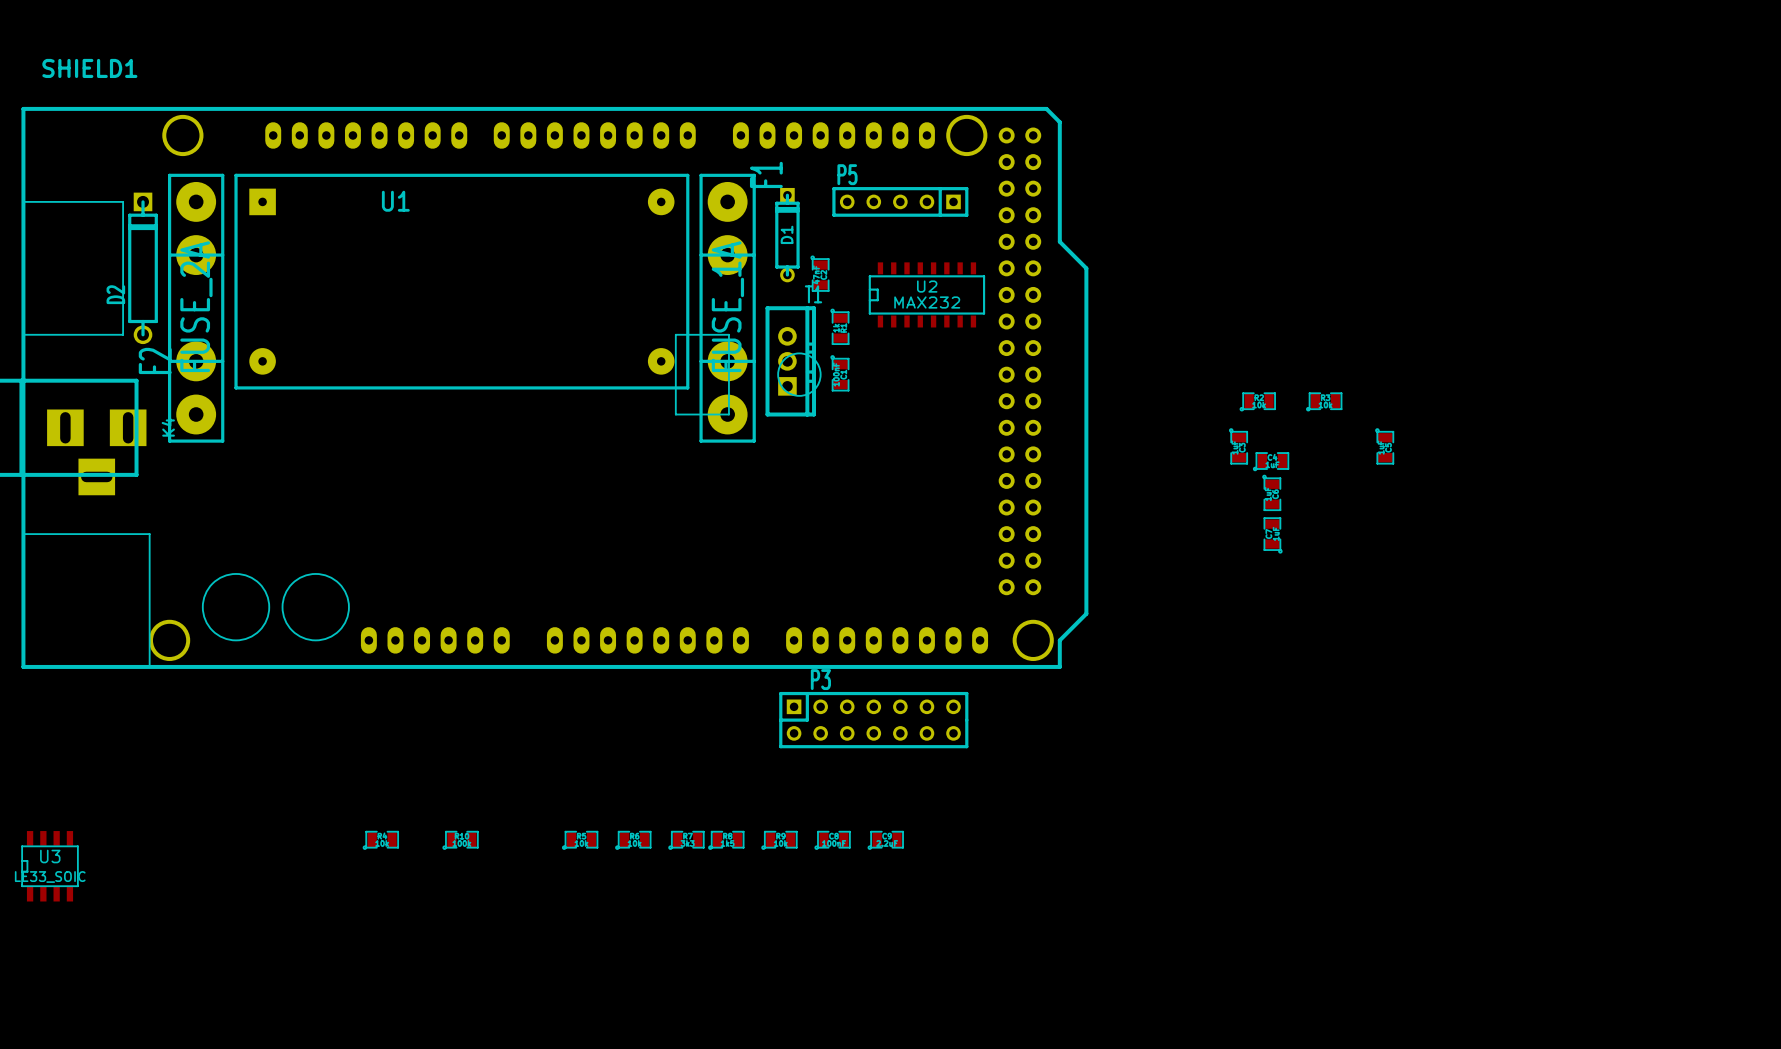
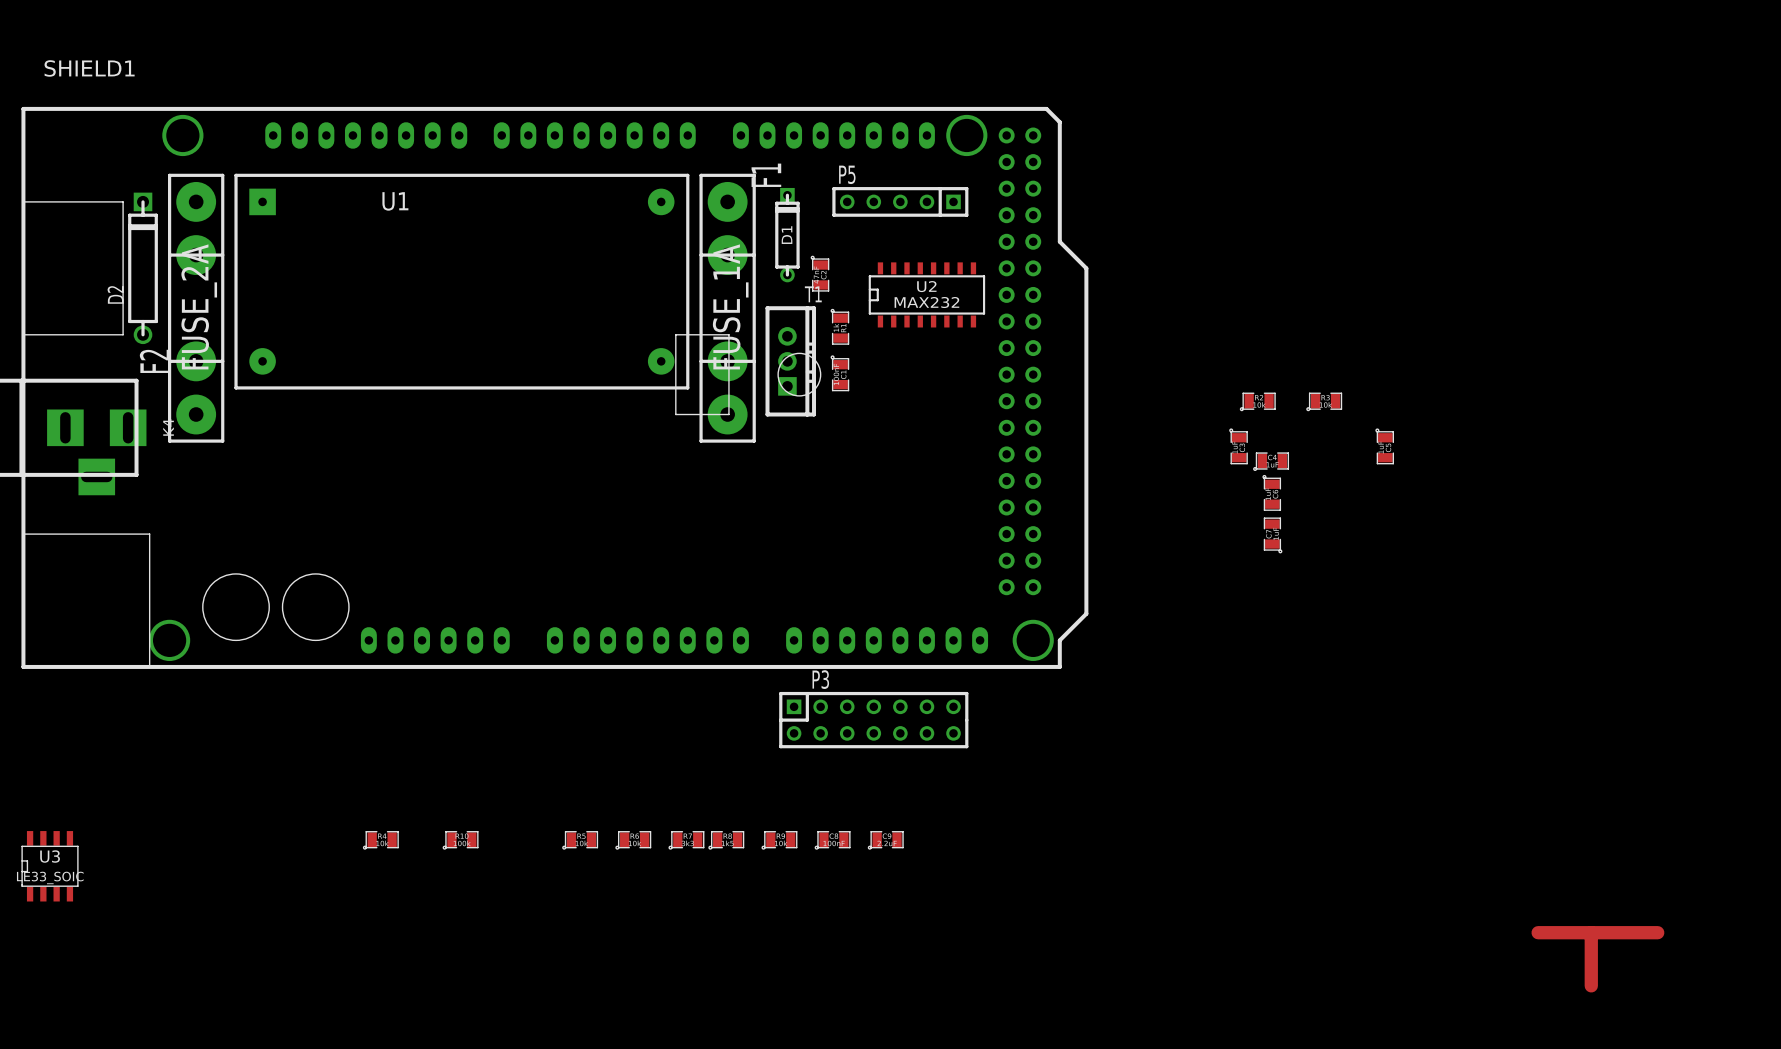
track: none -> (1538, 932) (1657, 932)
track: none -> (1591, 932) (1591, 985)

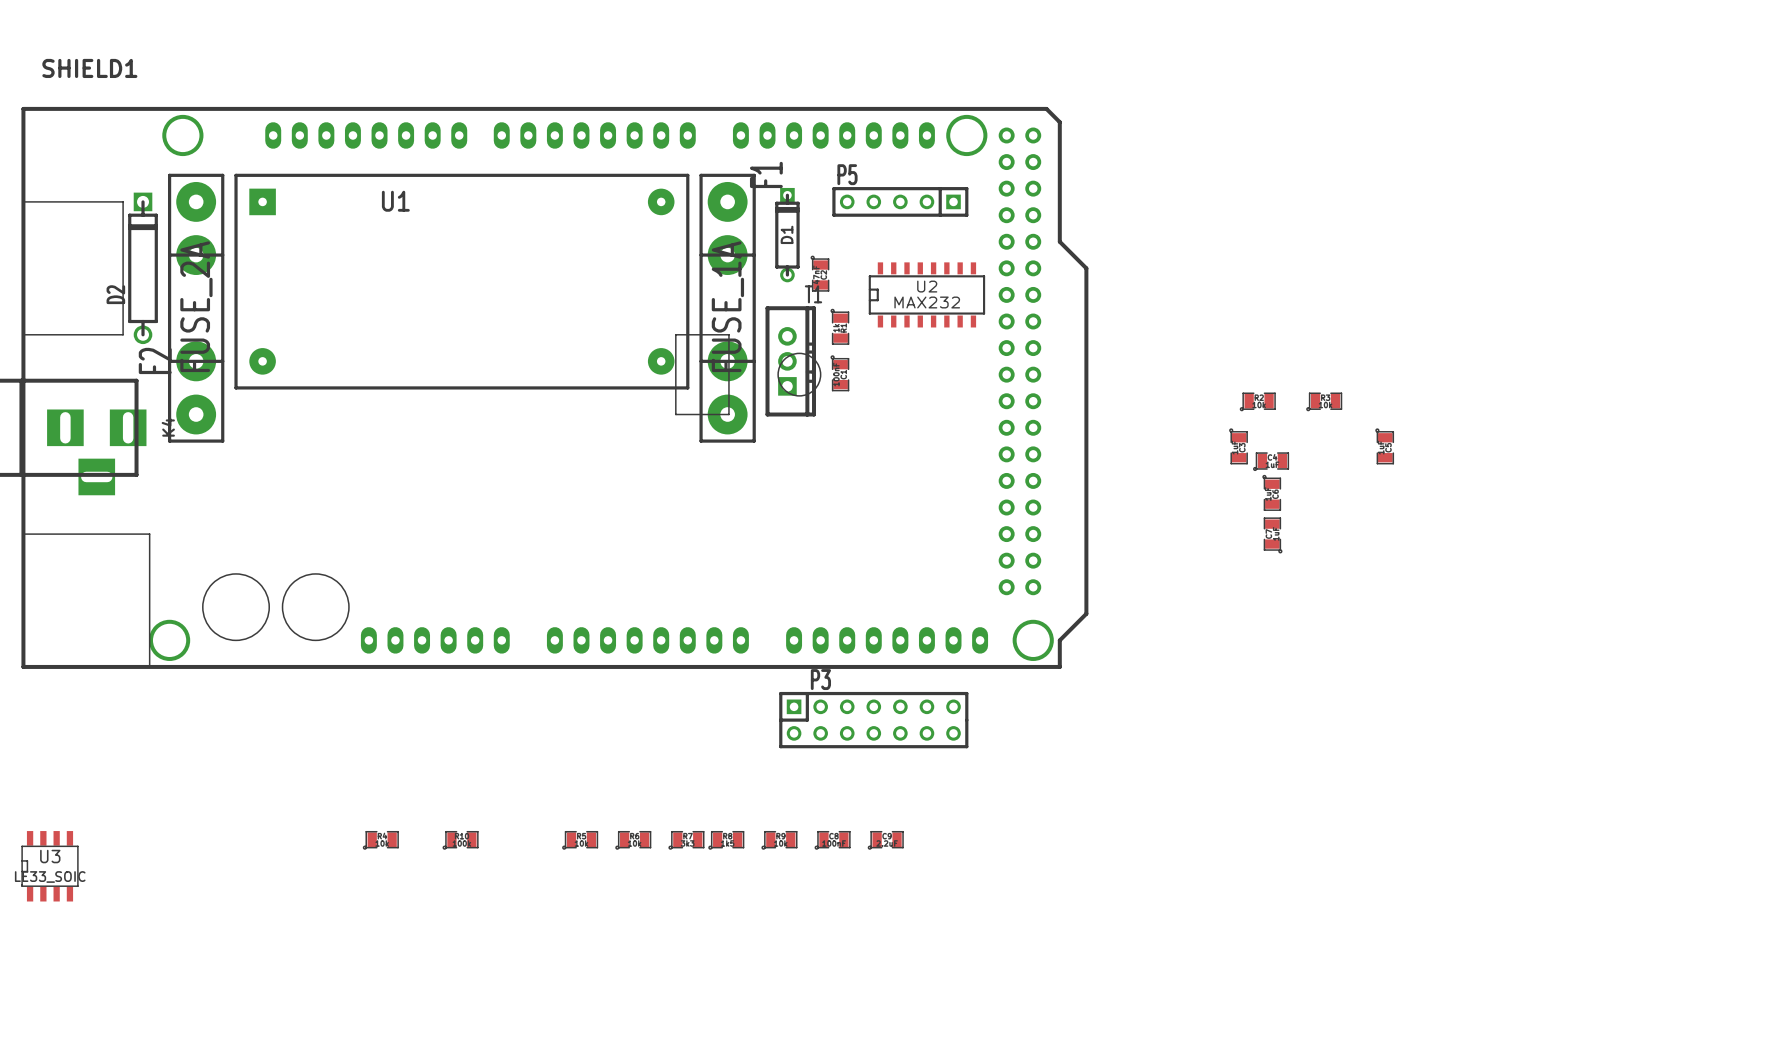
track: (1538, 932) (1657, 932) -> none
track: (1591, 932) (1591, 985) -> none

